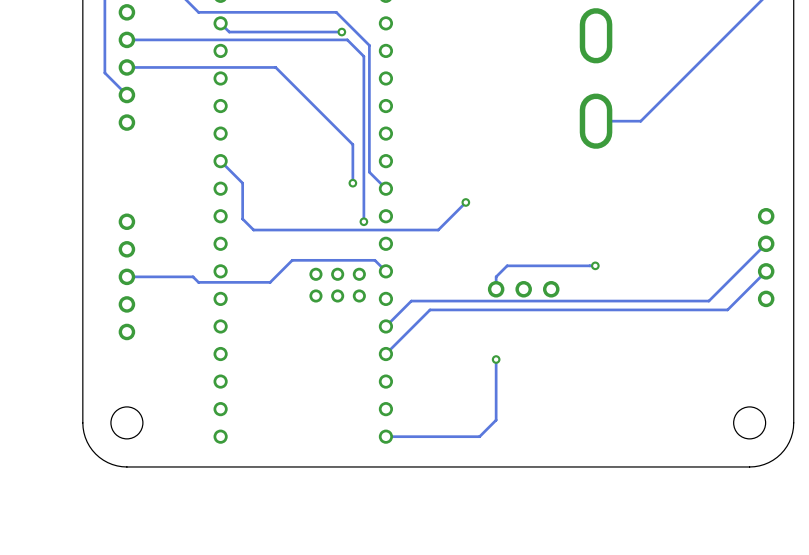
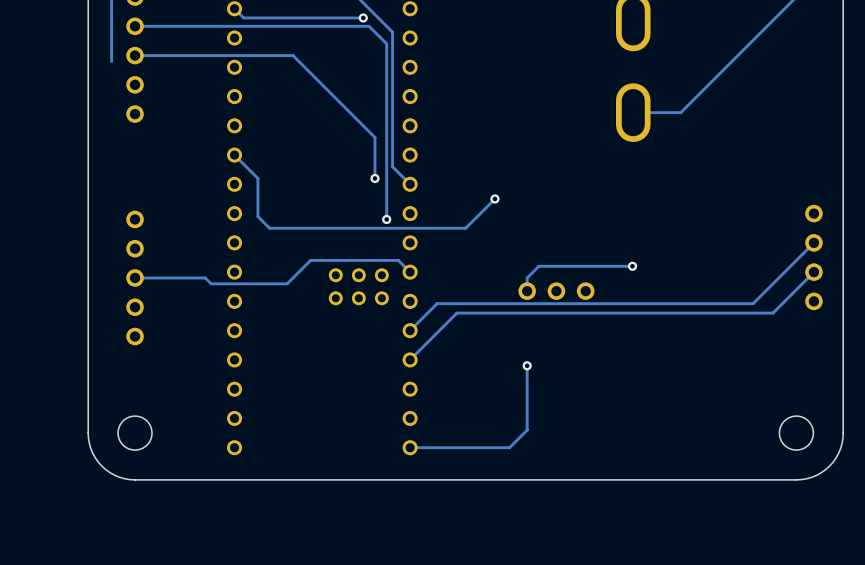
track: (104, 72) (126, 95) -> none

